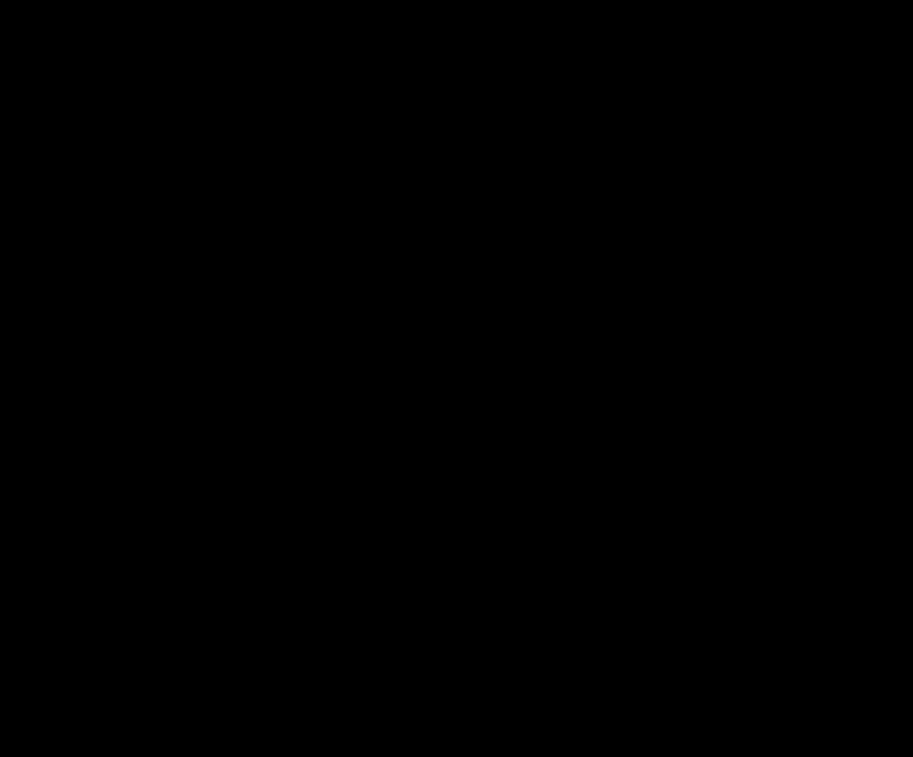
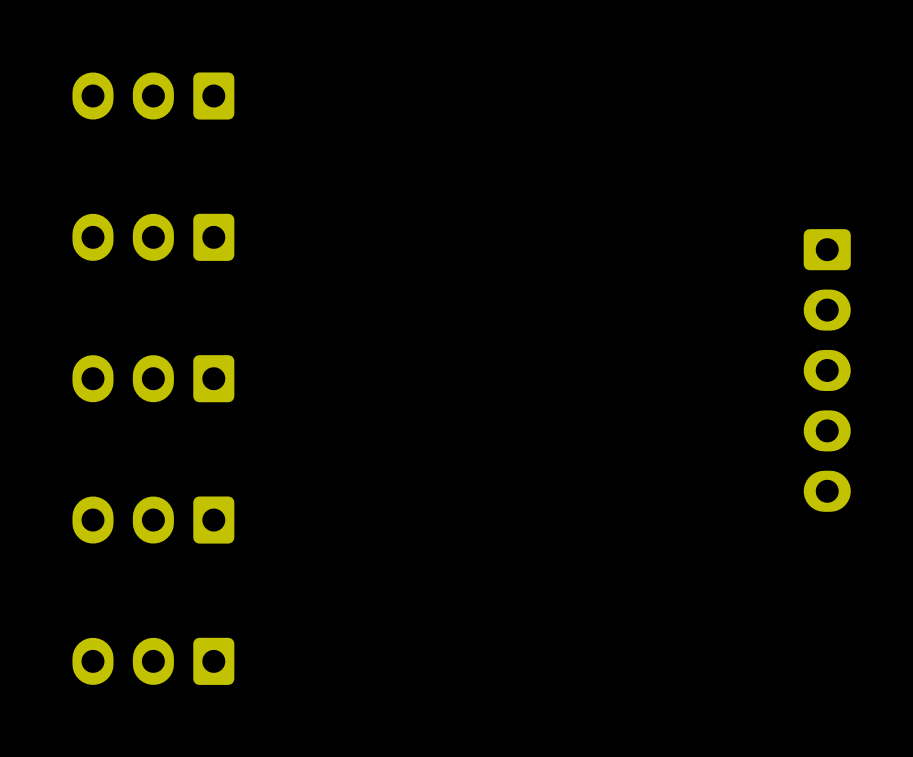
part: none -> (153, 96)
part: none -> (153, 237)
part: none -> (827, 370)
part: none -> (153, 378)
part: none -> (153, 520)
part: none -> (153, 661)

